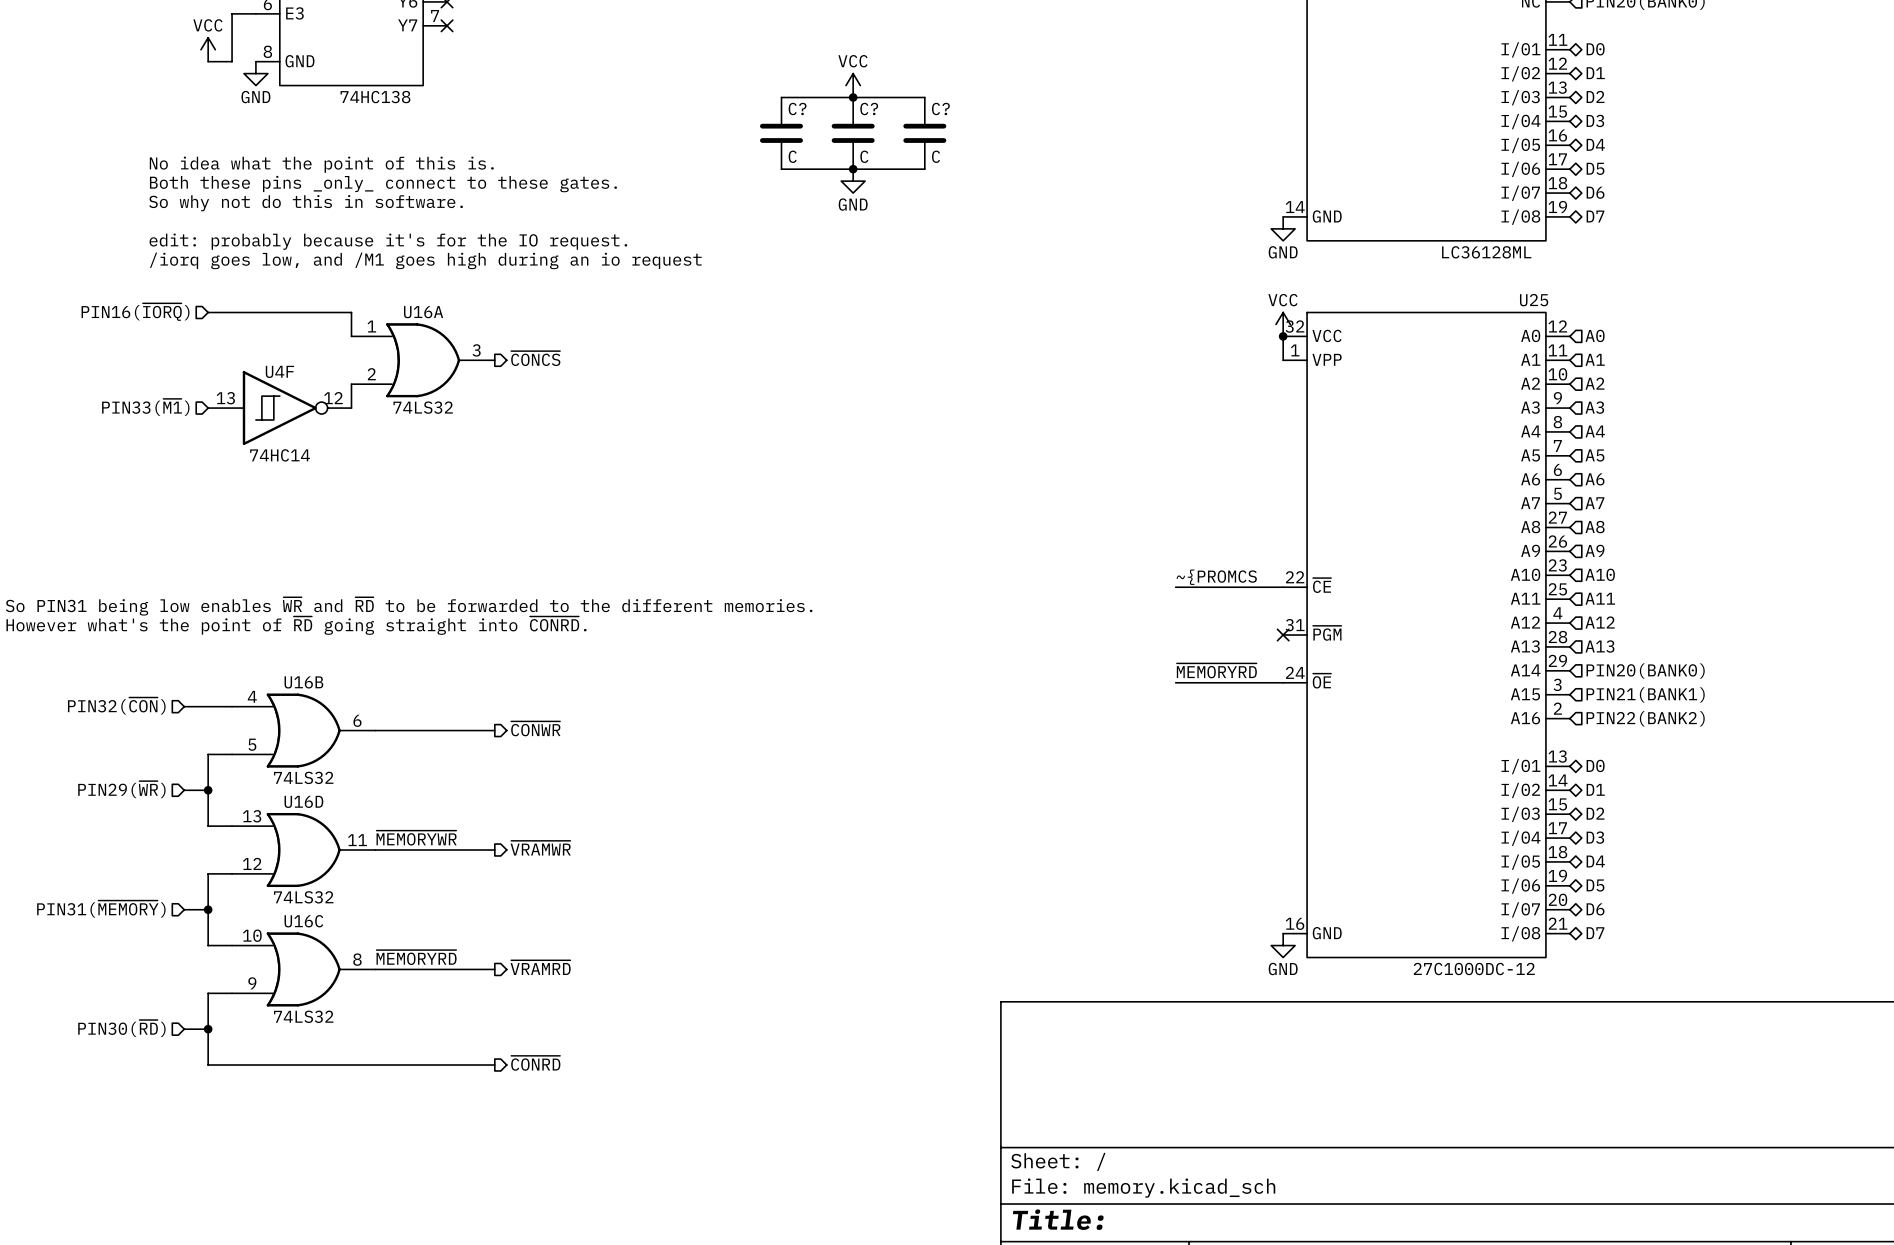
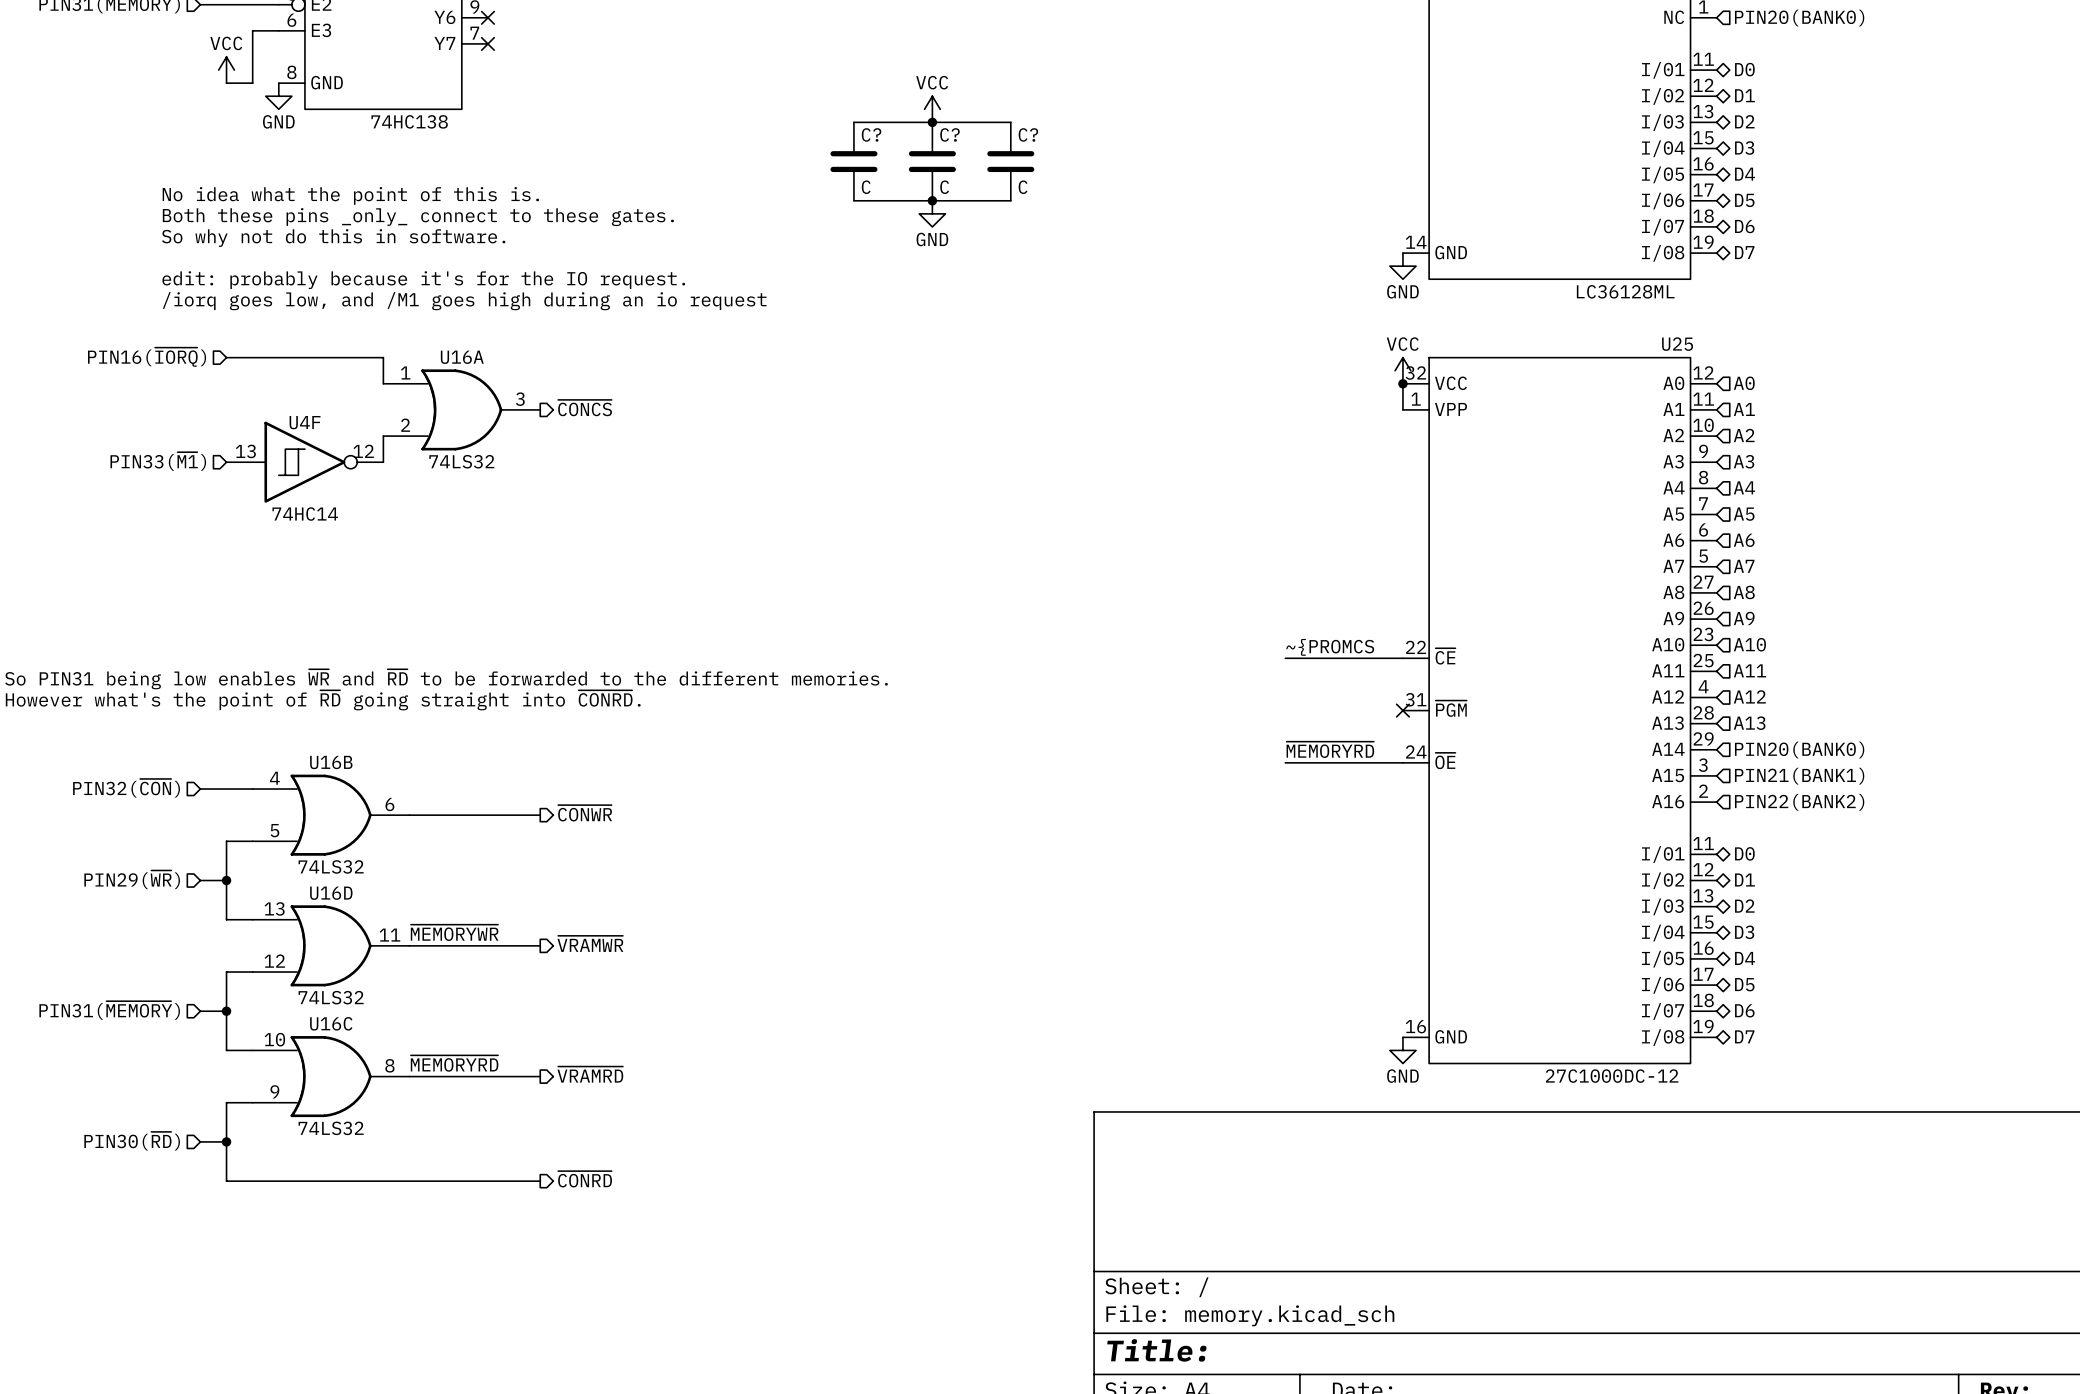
U25 pin number: 13 (1557, 756) -> 11 (1703, 843)
U25 pin number: 14 (1558, 780) -> 12 (1703, 869)
U25 pin number: 15 (1557, 804) -> 13 (1703, 895)
U25 pin number: 17 (1557, 828) -> 15 (1703, 922)
U25 pin number: 18 (1557, 852) -> 16 (1703, 948)
U25 pin number: 19 (1557, 875) -> 17 (1703, 974)
U25 pin number: 20 (1557, 899) -> 18 (1703, 1000)
U25 pin number: 21 (1558, 923) -> 19 (1703, 1026)

